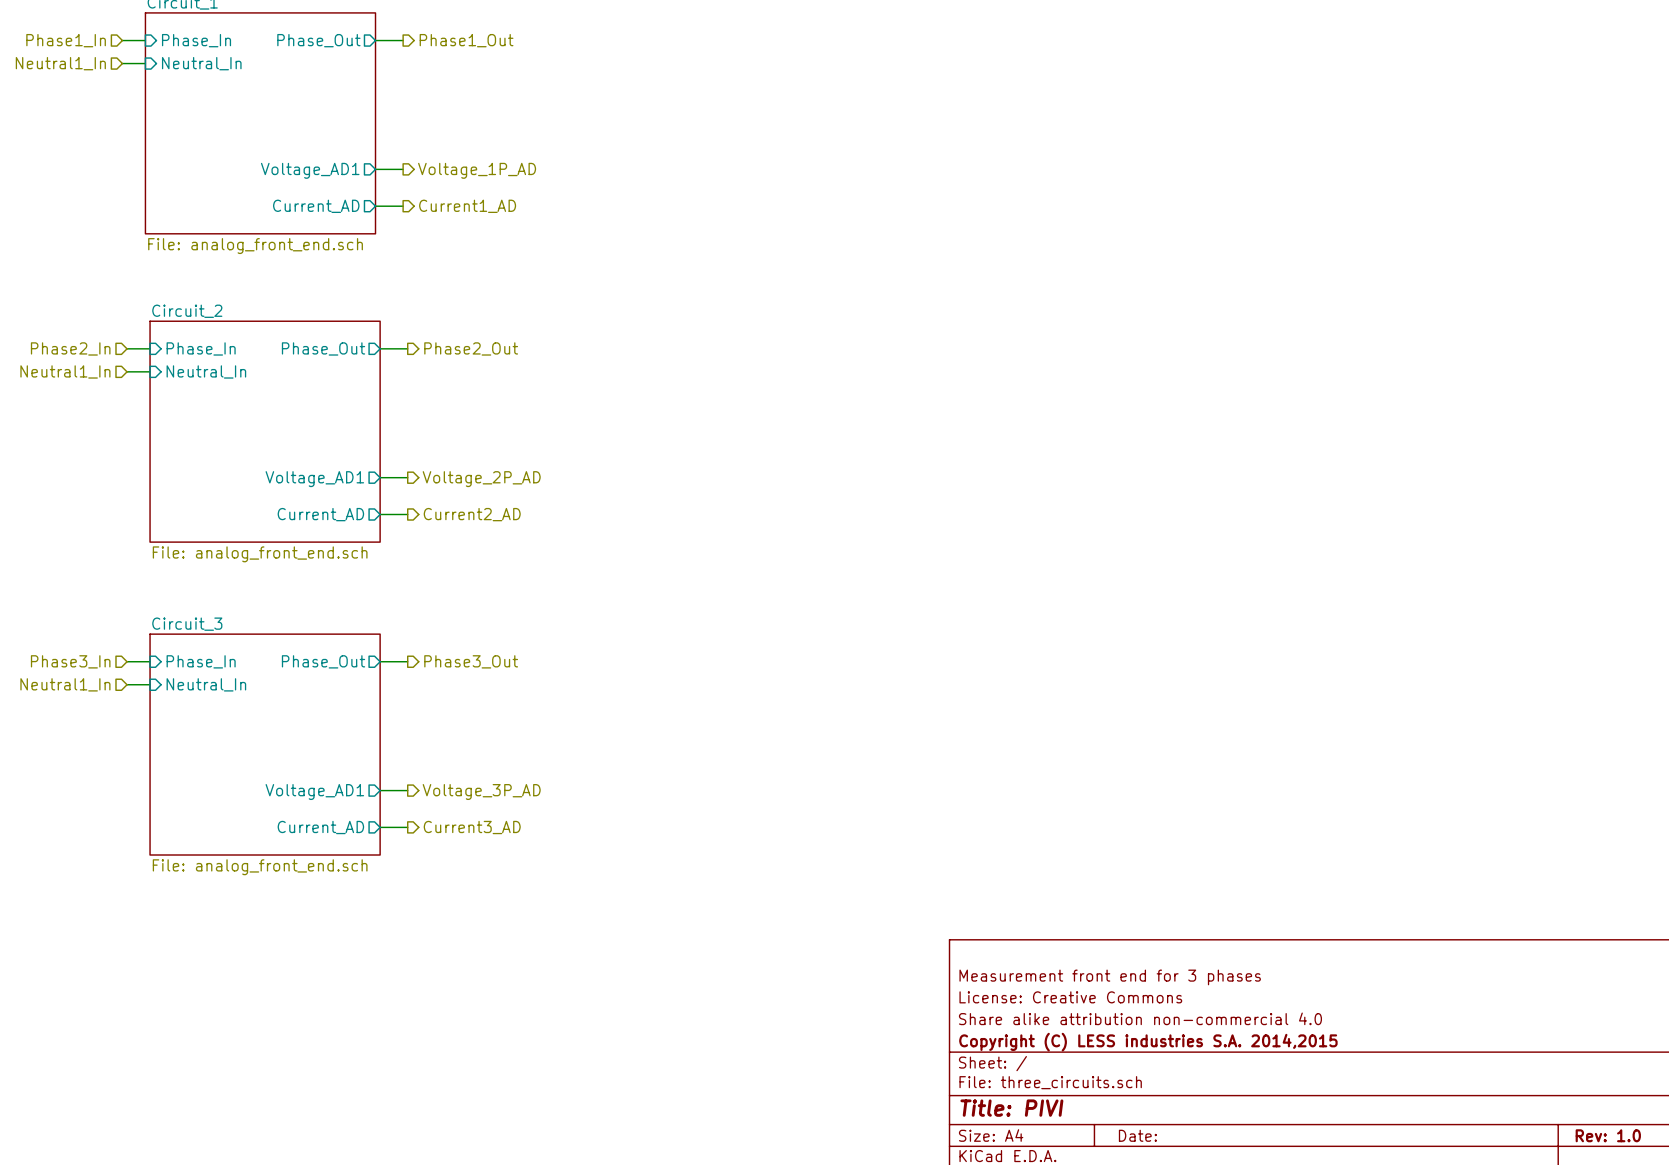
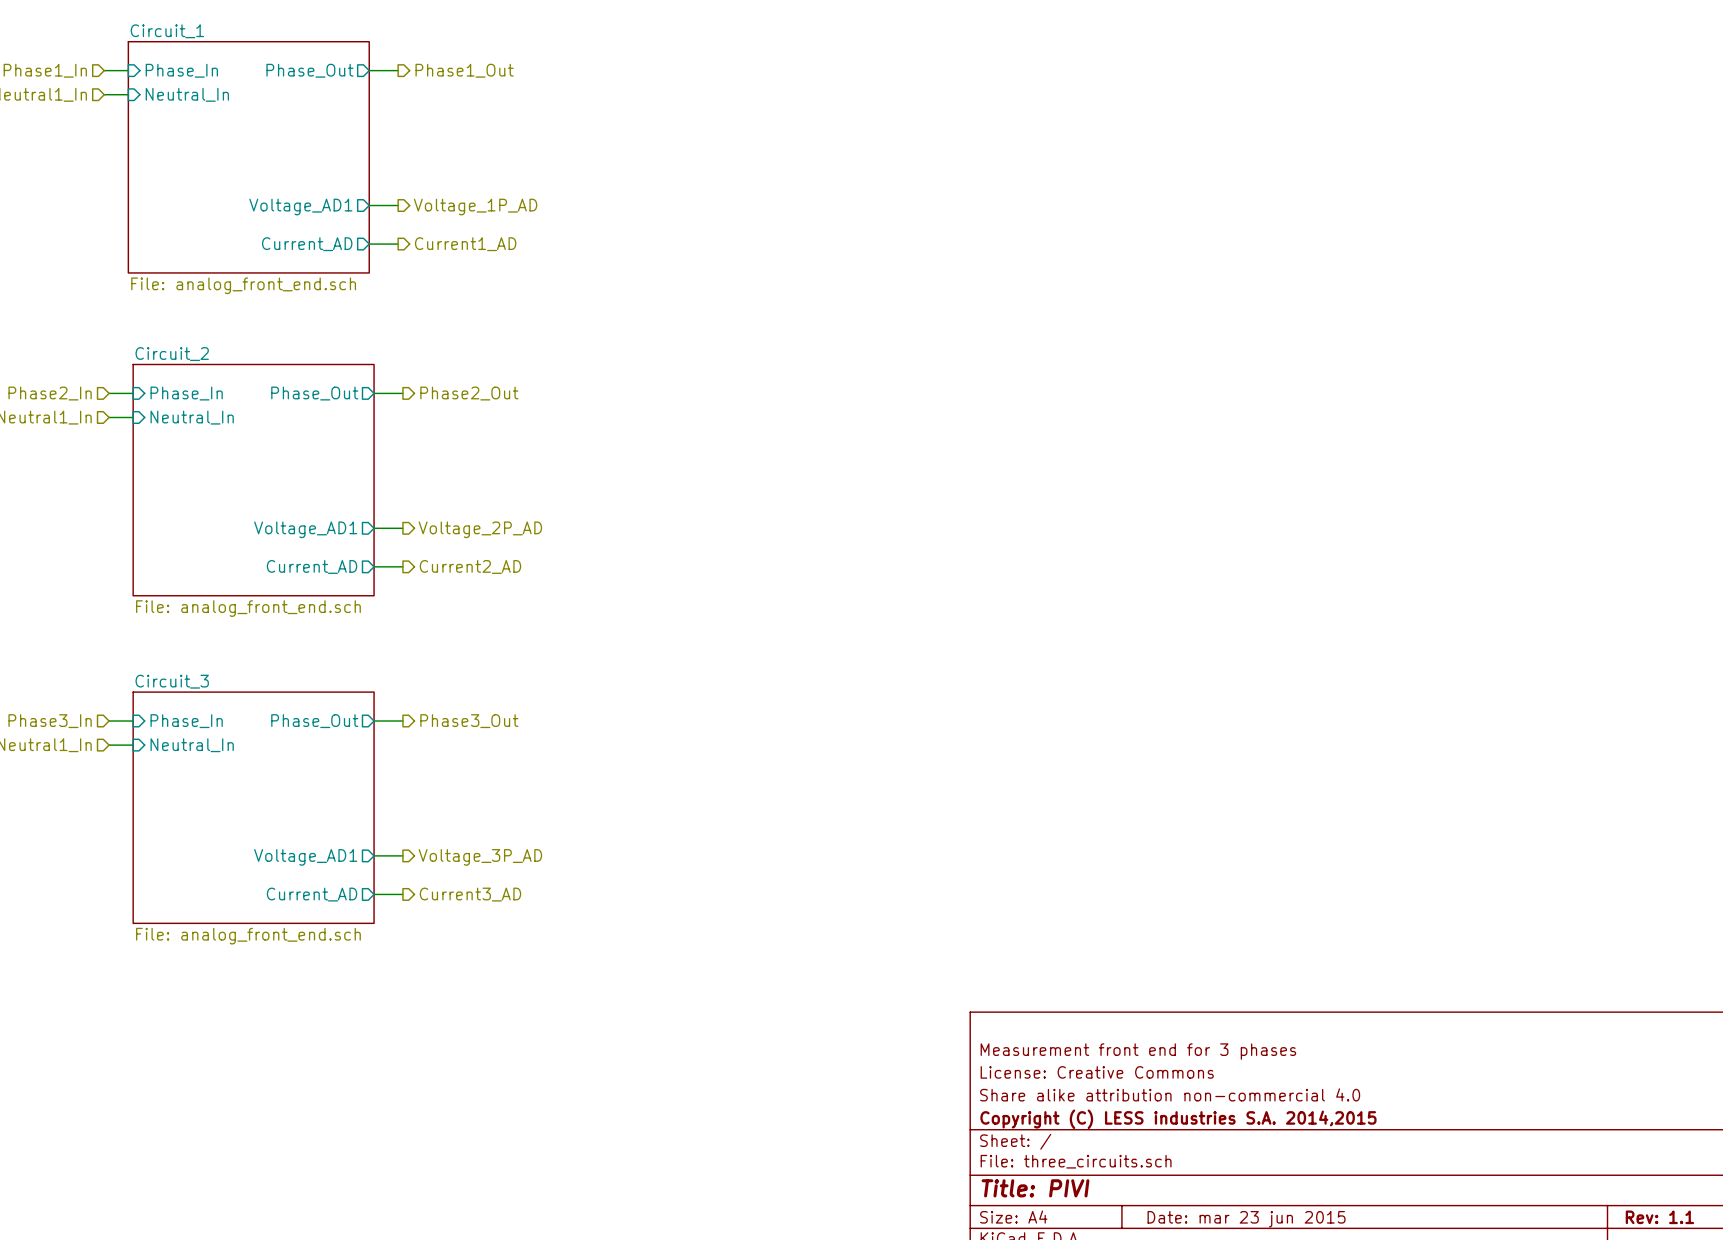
title block: Date: (1137, 1135) -> Date: mar 23 jun 2015 (1246, 1219)
title block: Rev: 1.0 (1608, 1135) -> Rev: 1.1 (1659, 1217)

